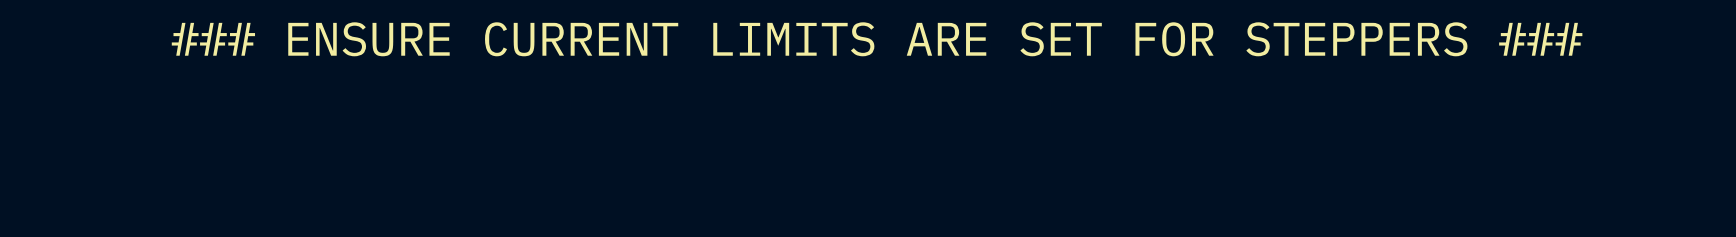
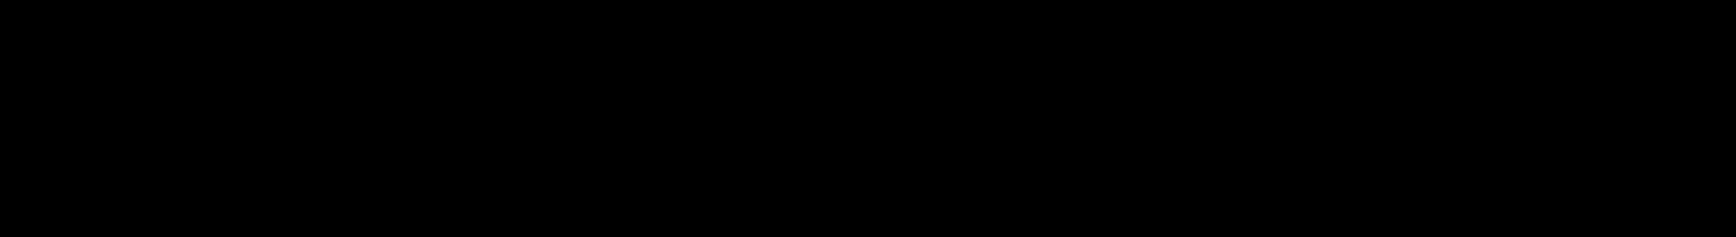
text: ### ENSURE CURRENT LIMITS ARE SET FOR STEPPERS ### (877, 39) -> none

